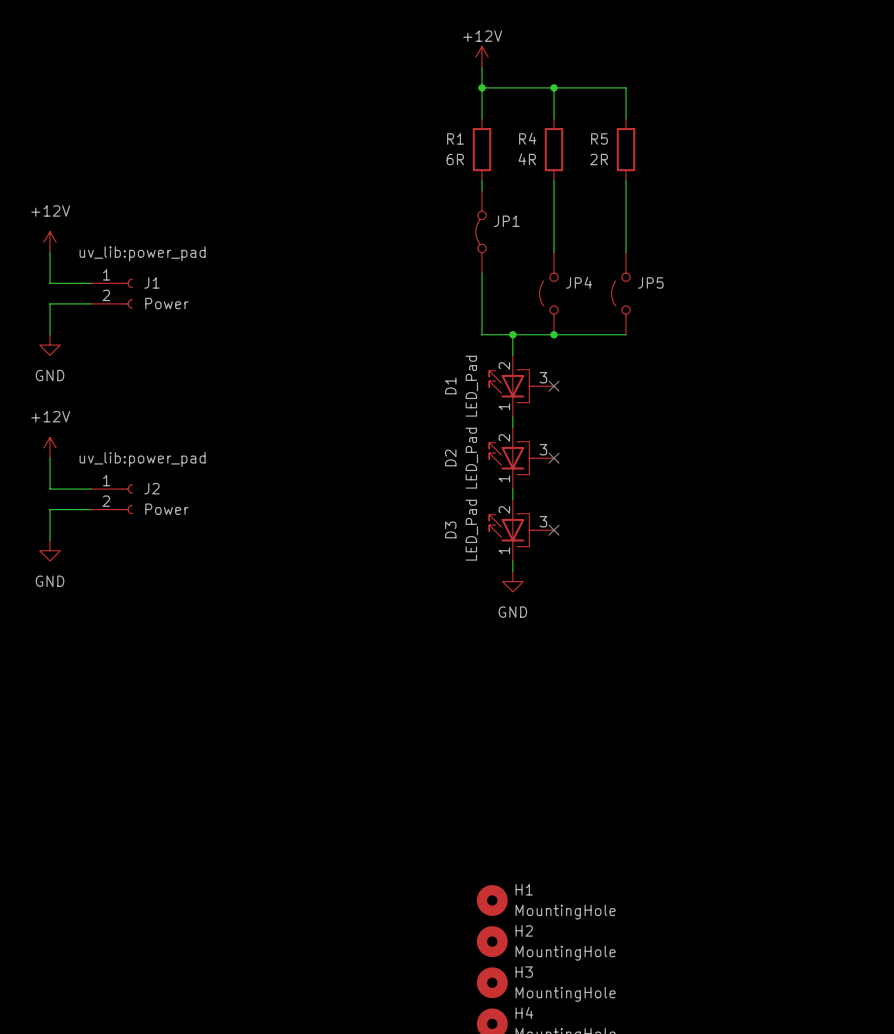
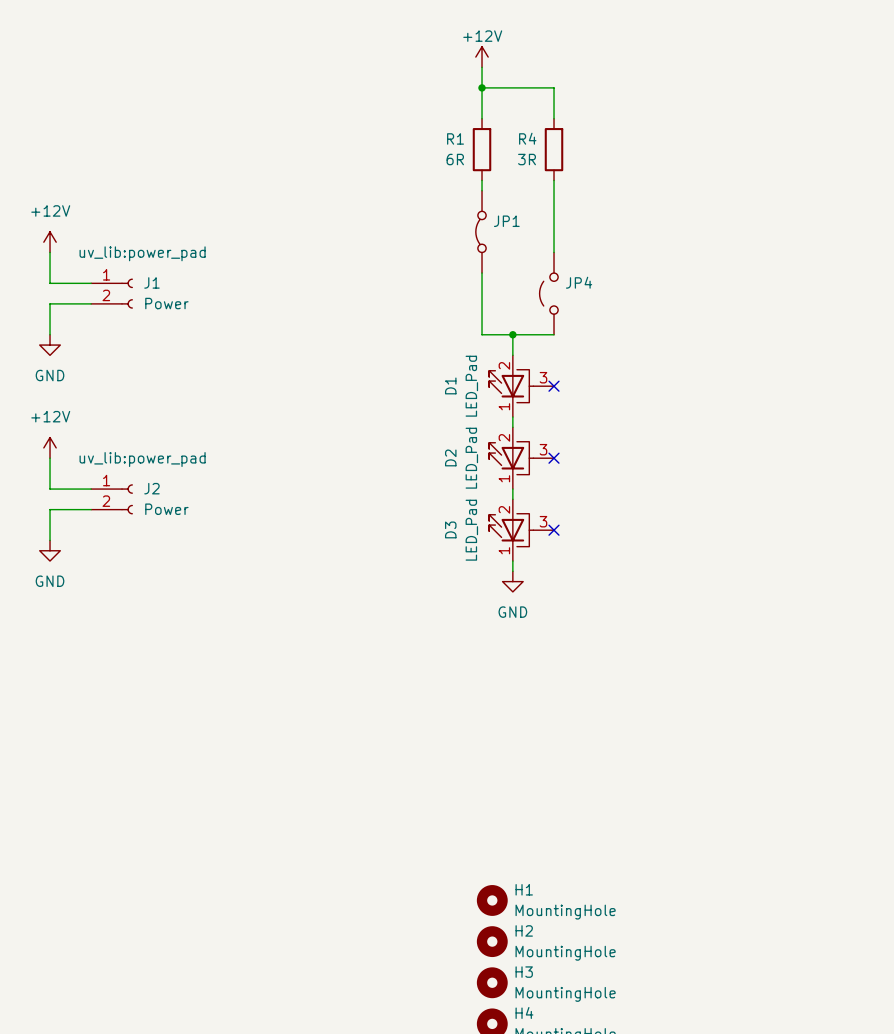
wire: (554, 87) (626, 87) (626, 118) -> none
junction: (554, 87) -> none
R5: 2R (626, 149) -> none
R4 value: 4R (527, 159) -> 3R (527, 159)
wire: (626, 180) (626, 252) -> none
JP5: (620, 293) -> none
wire: (554, 334) (626, 334) -> none
junction: (554, 334) -> none

